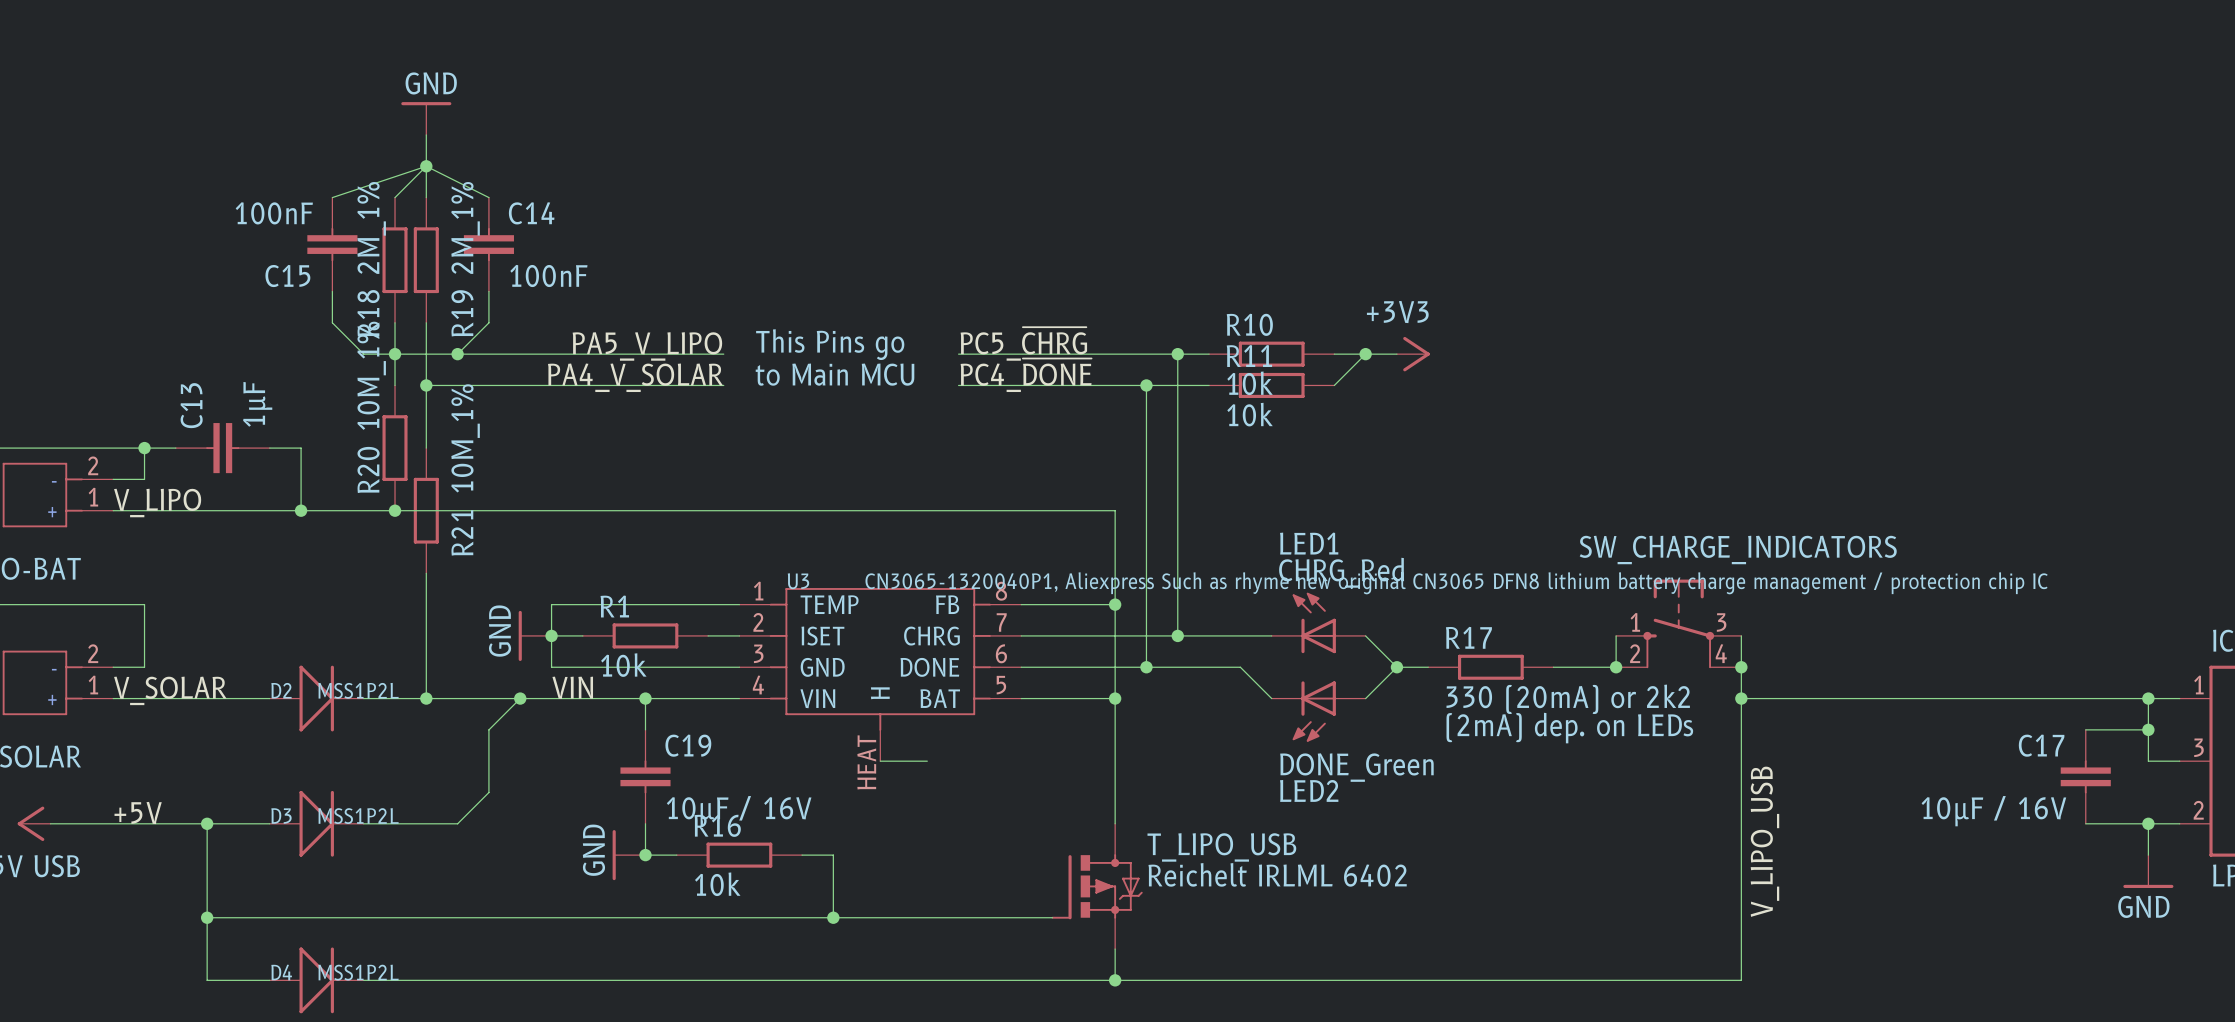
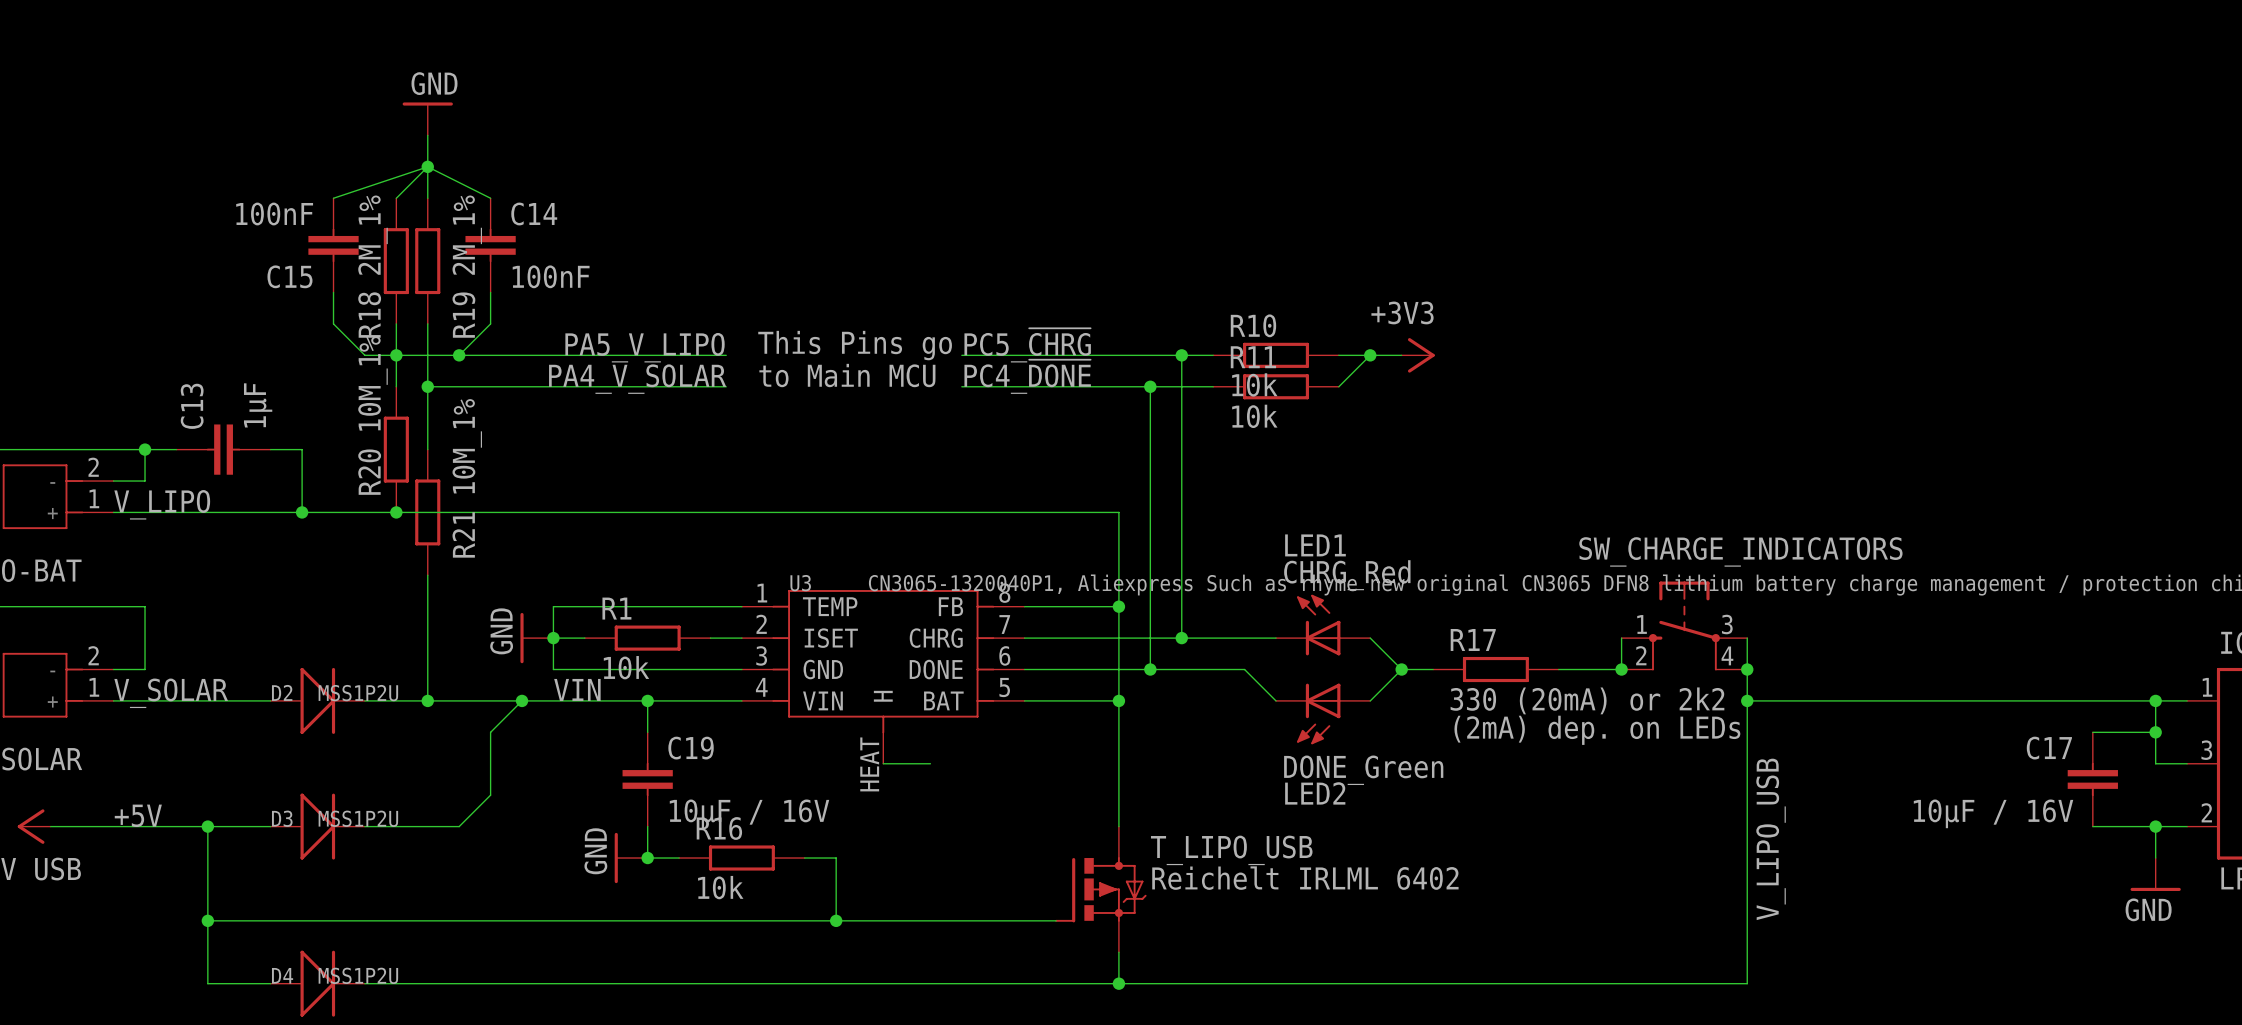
D2 value: MSS1P2L (358, 690) -> MSS1P2U (358, 693)
D3 value: MSS1P2L (358, 816) -> MSS1P2U (358, 818)
D4 value: MSS1P2L (358, 972) -> MSS1P2U (358, 975)

